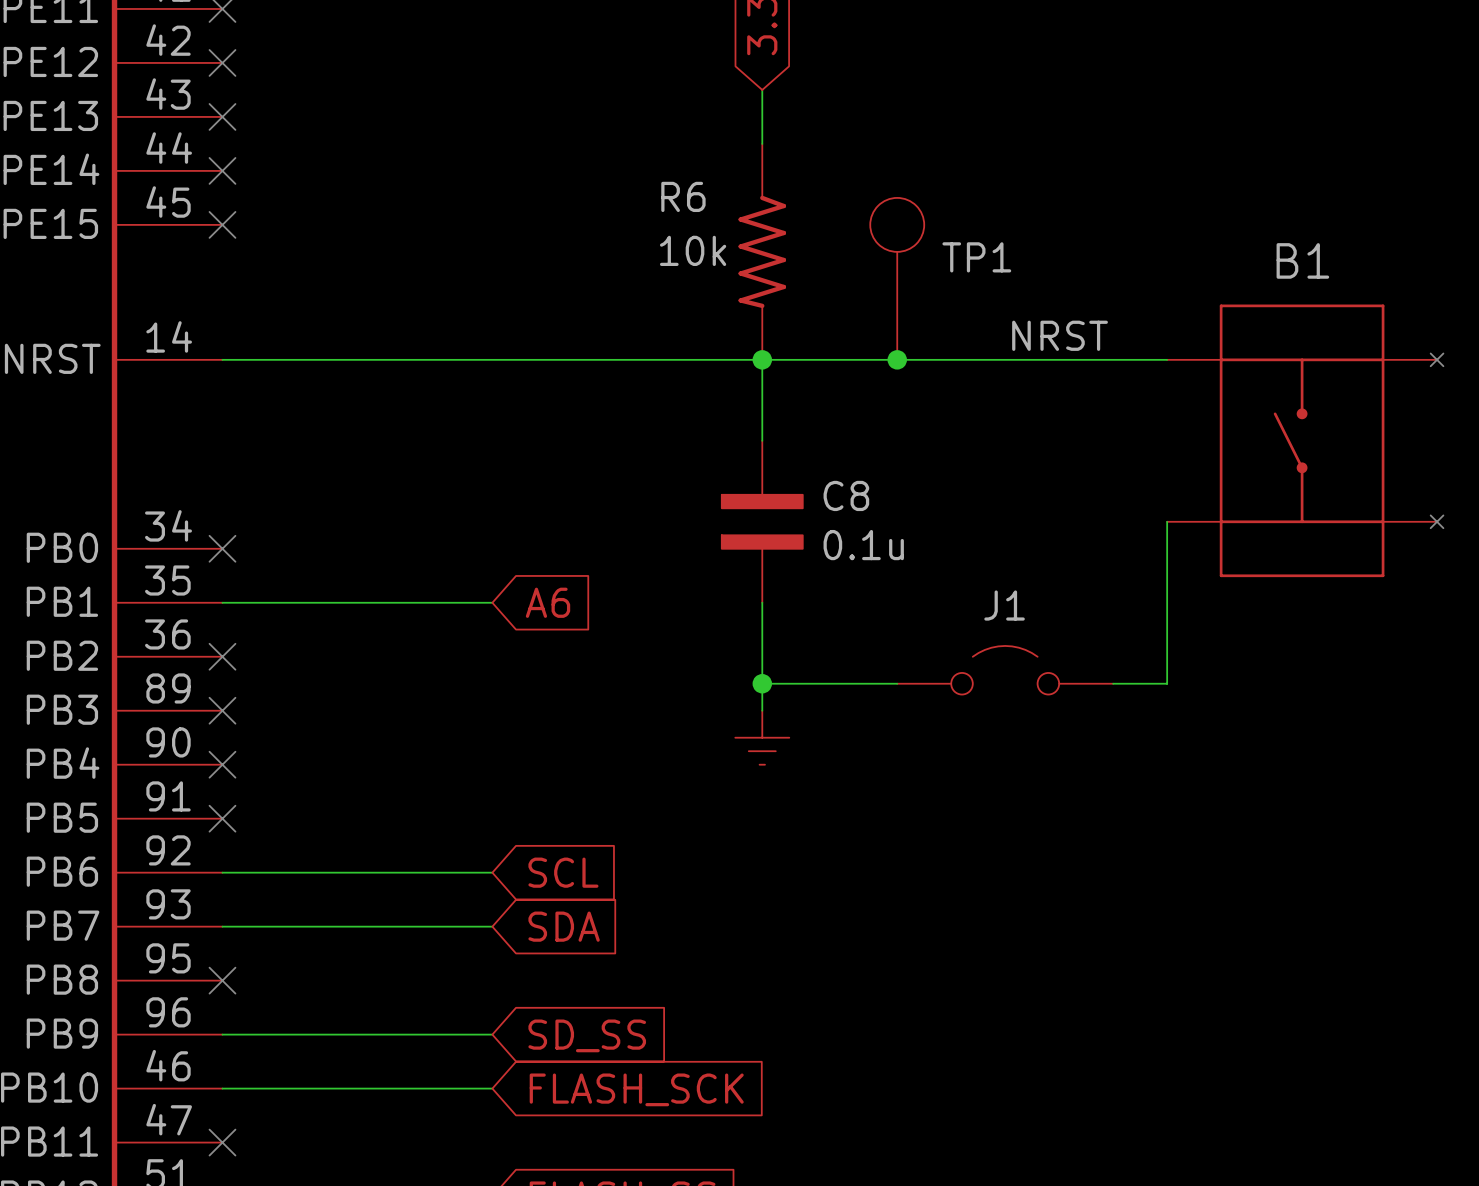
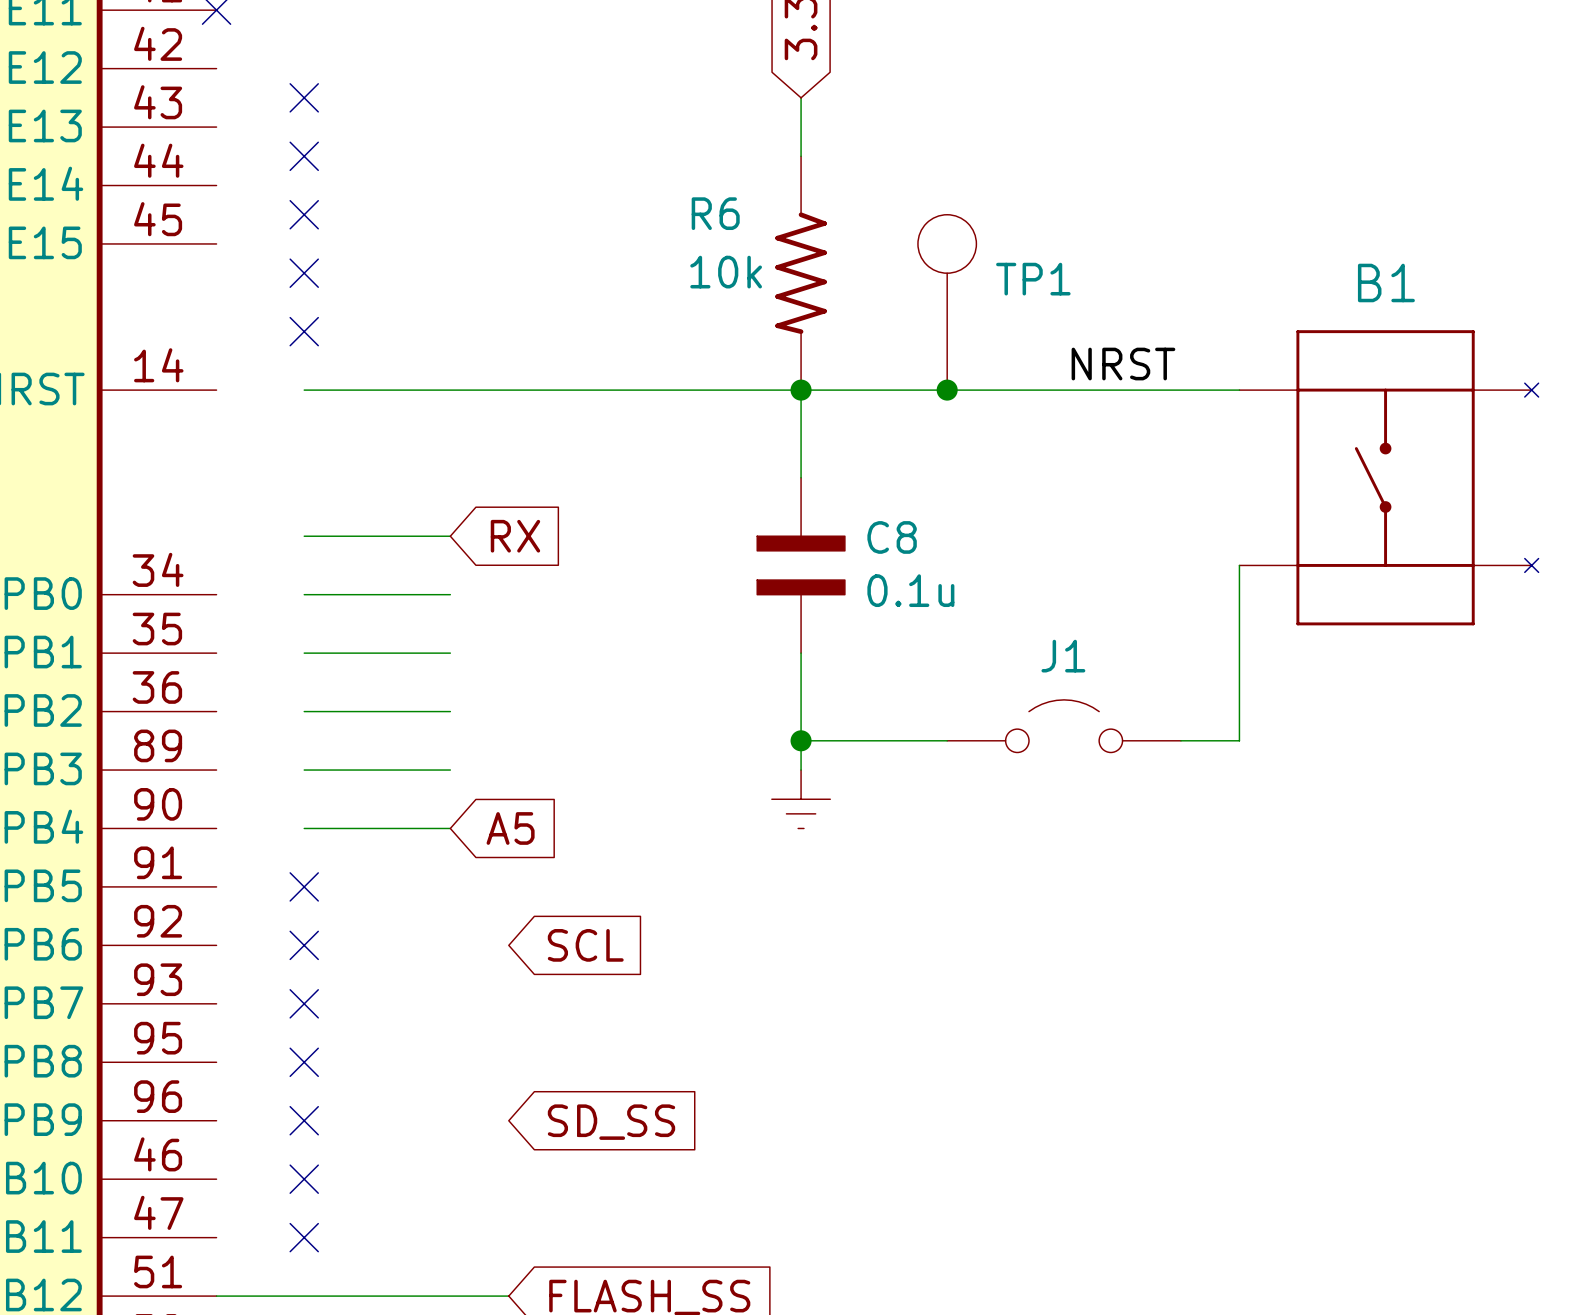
no-connect mark: (222, 62) -> none
no-connect mark: none -> (304, 97)
no-connect mark: (222, 116) -> none
no-connect mark: none -> (304, 156)
no-connect mark: (222, 170) -> none
no-connect mark: none -> (304, 214)
no-connect mark: (222, 224) -> none
no-connect mark: none -> (304, 273)
no-connect mark: none -> (304, 331)
wire: (222, 359) (303, 359) -> none
wire: none -> (304, 536) (450, 536)
global label: none -> RX (515, 536)
no-connect mark: (222, 548) -> none
wire: none -> (304, 594) (450, 594)
wire: (222, 602) (303, 602) -> none
wire: (438, 602) (492, 602) -> none
global label: A6 (548, 602) -> none
no-connect mark: (222, 656) -> none
wire: none -> (304, 711) (450, 711)
no-connect mark: (222, 710) -> none
wire: none -> (304, 770) (450, 770)
no-connect mark: (222, 764) -> none
wire: none -> (304, 828) (450, 828)
global label: none -> A5 (510, 828)
no-connect mark: (222, 818) -> none
no-connect mark: none -> (304, 886)
wire: (222, 872) (492, 872) -> none
no-connect mark: none -> (304, 945)
wire: (222, 926) (492, 926) -> none
no-connect mark: none -> (304, 1003)
global label: SDA (564, 926) -> none
no-connect mark: (222, 980) -> none
no-connect mark: none -> (304, 1062)
wire: (222, 1034) (492, 1034) -> none
no-connect mark: none -> (304, 1120)
wire: (222, 1088) (492, 1088) -> none
no-connect mark: none -> (304, 1179)
global label: FLASH_SCK (636, 1089) -> none
no-connect mark: (222, 1142) -> none
no-connect mark: none -> (304, 1237)

